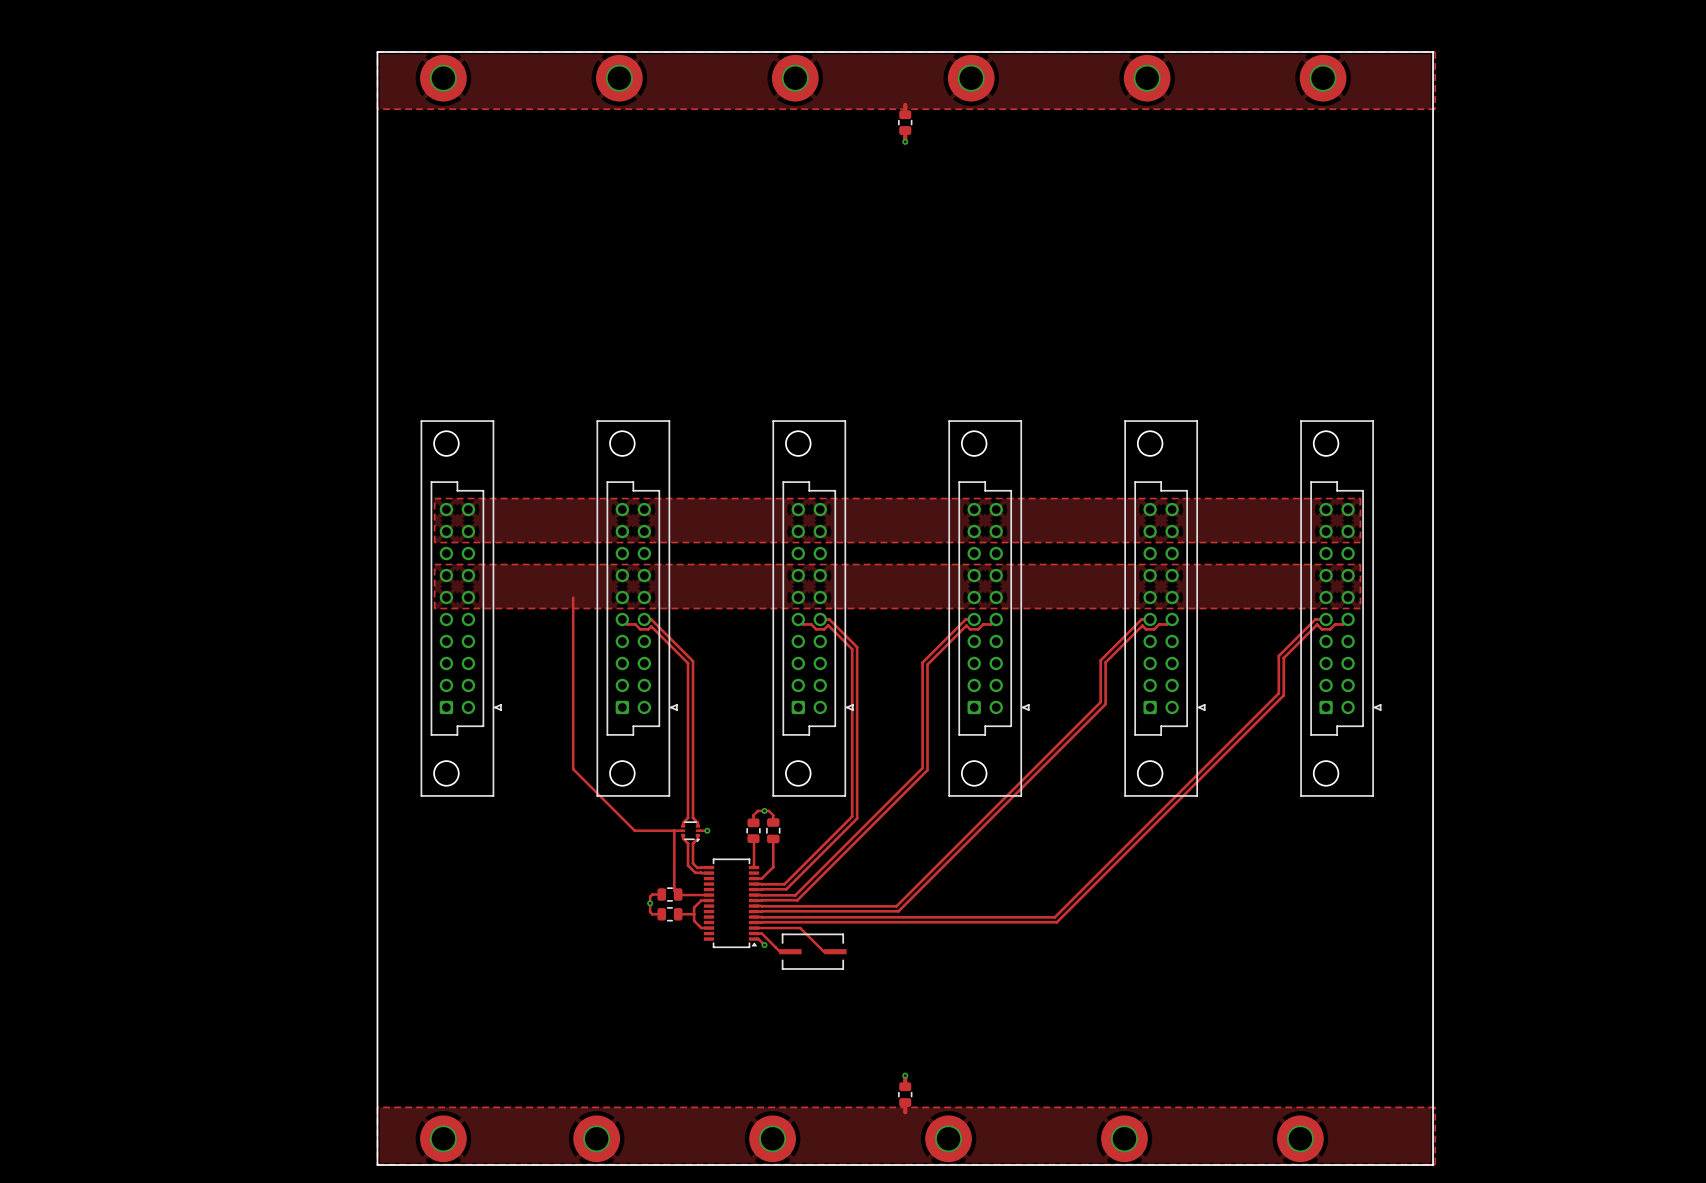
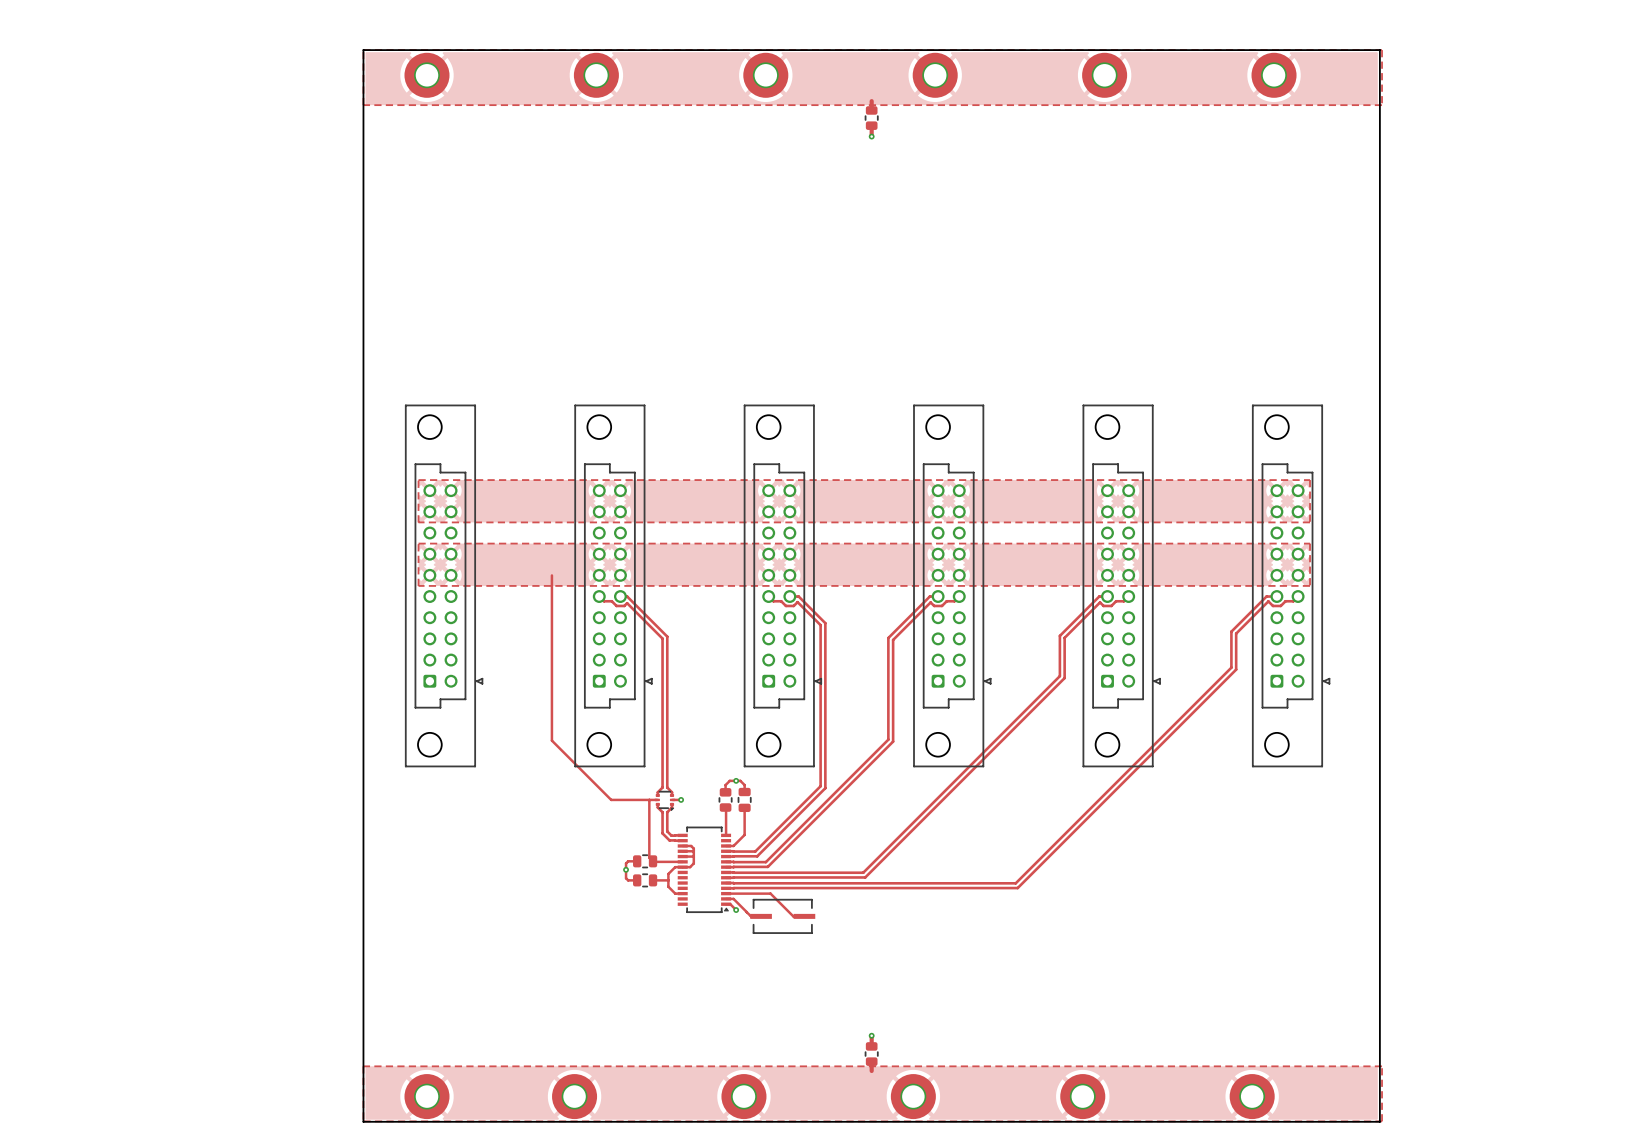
track: none -> (682, 845) (691, 845) (693, 848) (693, 863) (690, 867) (682, 867)
track: none -> (693, 850) (682, 851)
track: none -> (682, 856) (693, 857)

